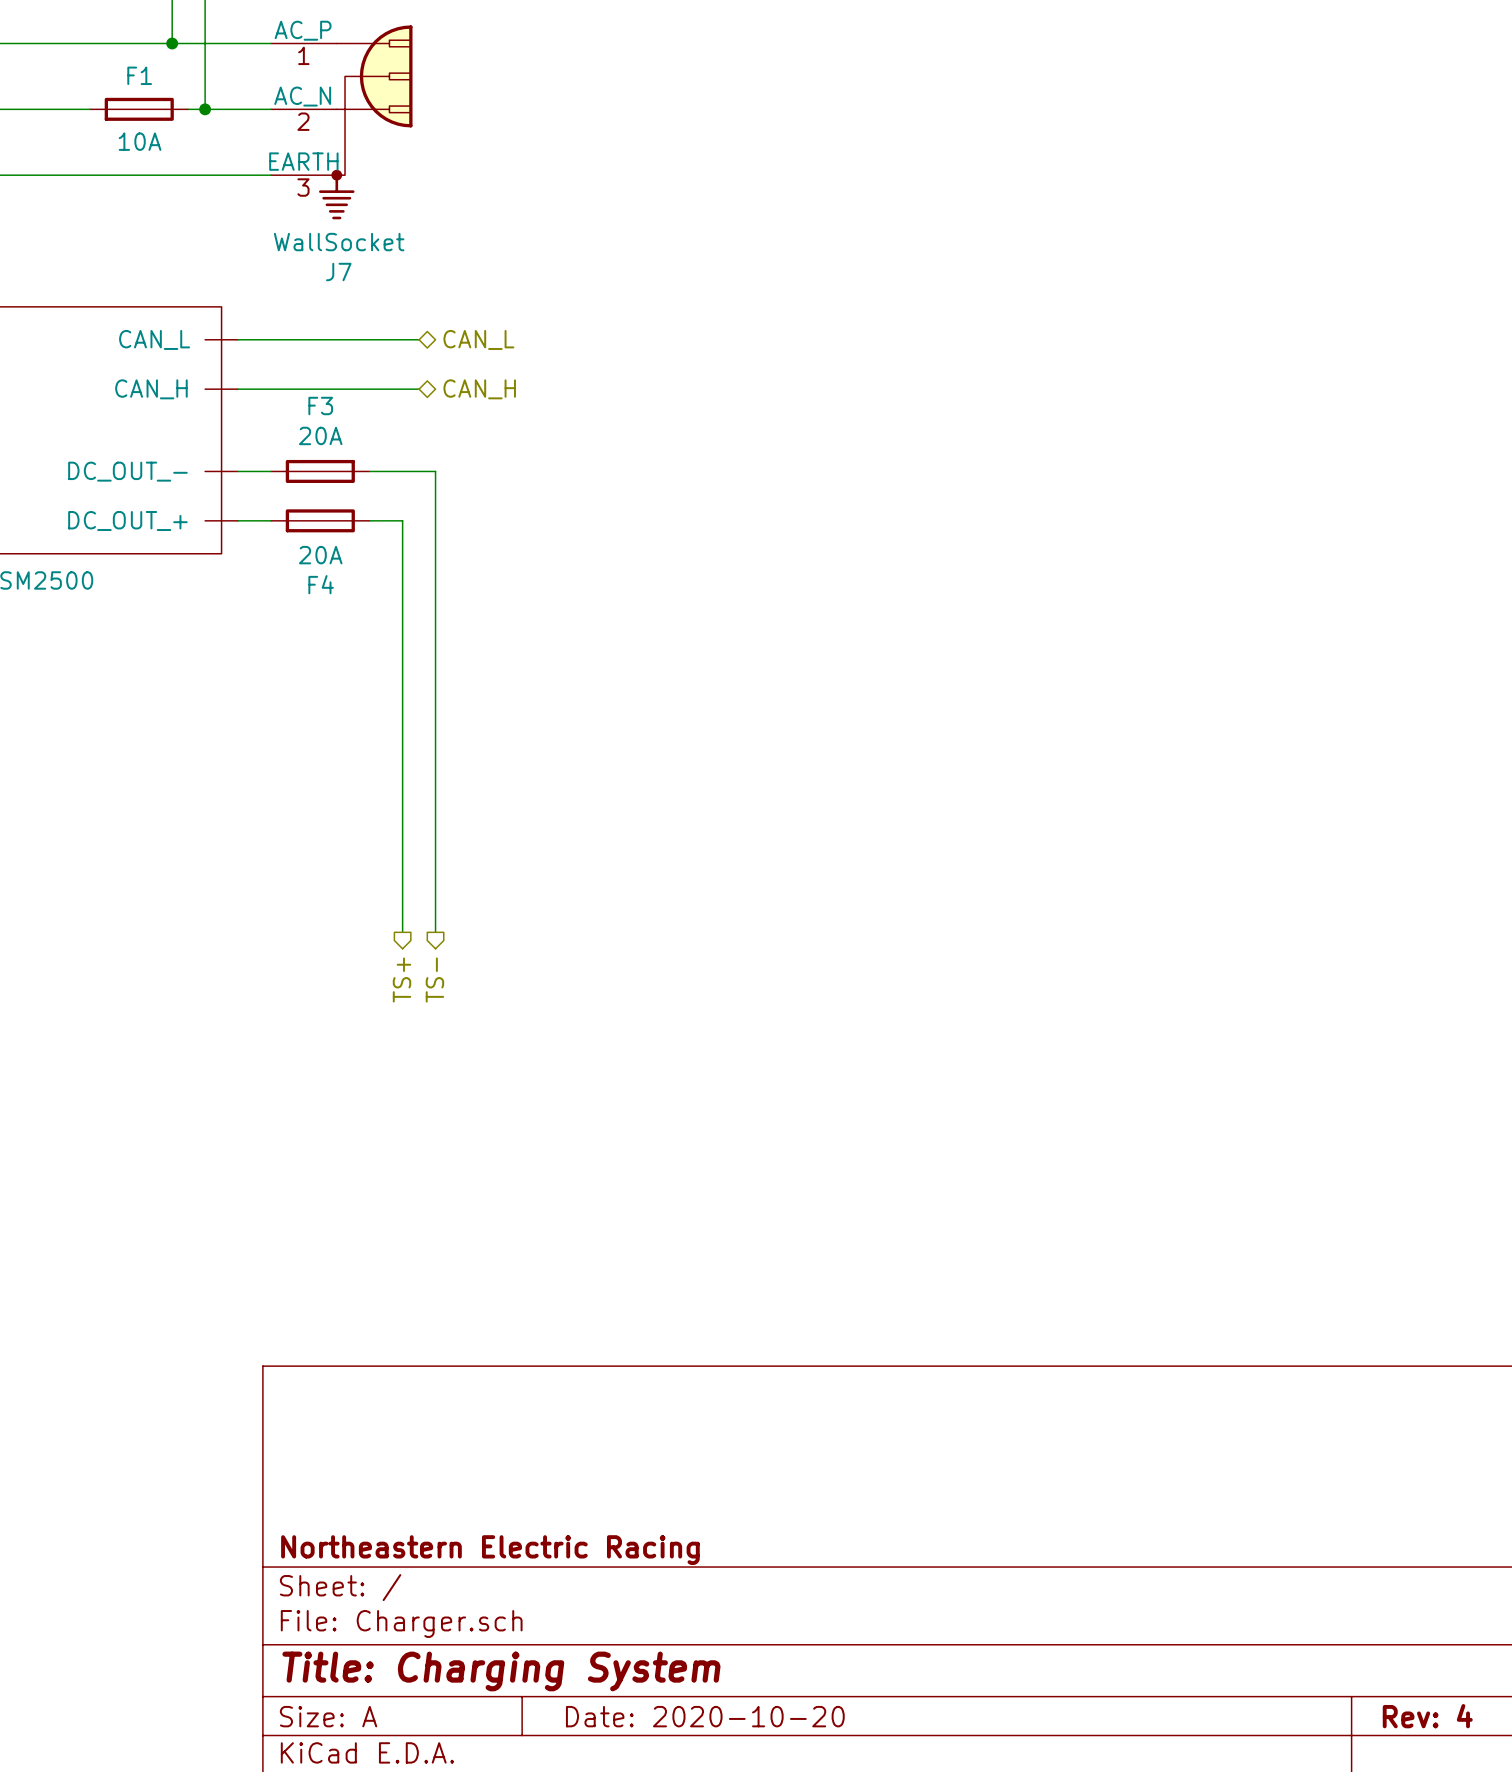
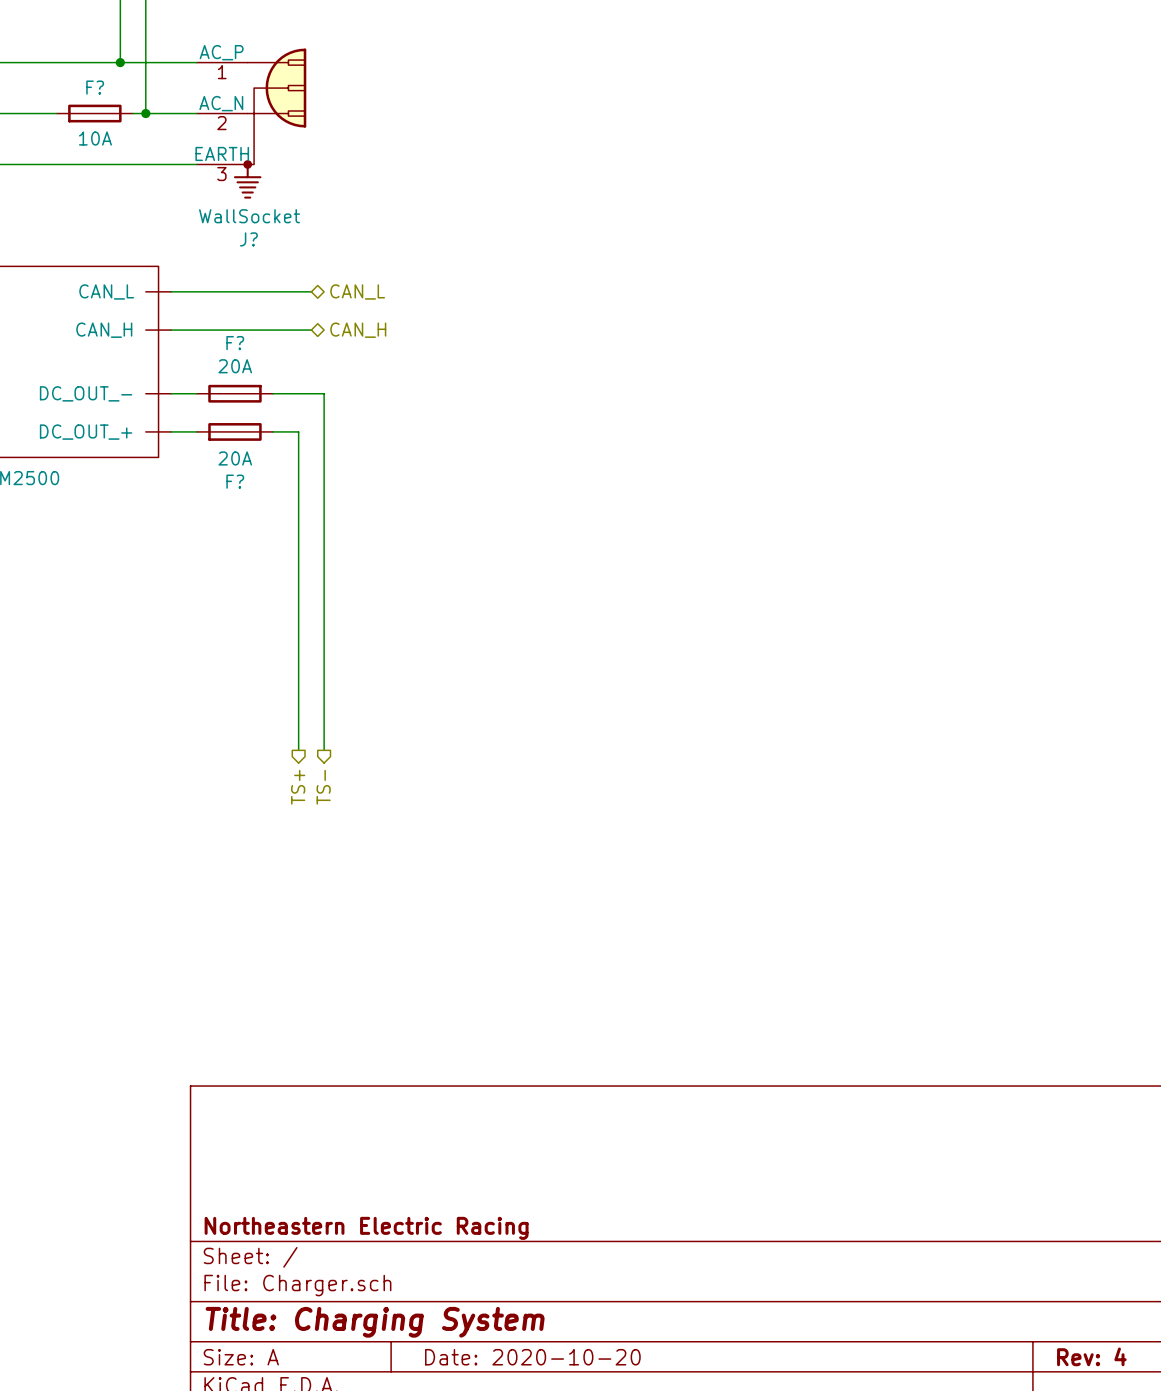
F1 name: F1 (139, 75) -> F? (95, 87)
J7 name: J7 (338, 272) -> J? (248, 239)
F3 name: F3 (320, 405) -> F? (235, 343)
F4 name: F4 (321, 584) -> F? (235, 481)

